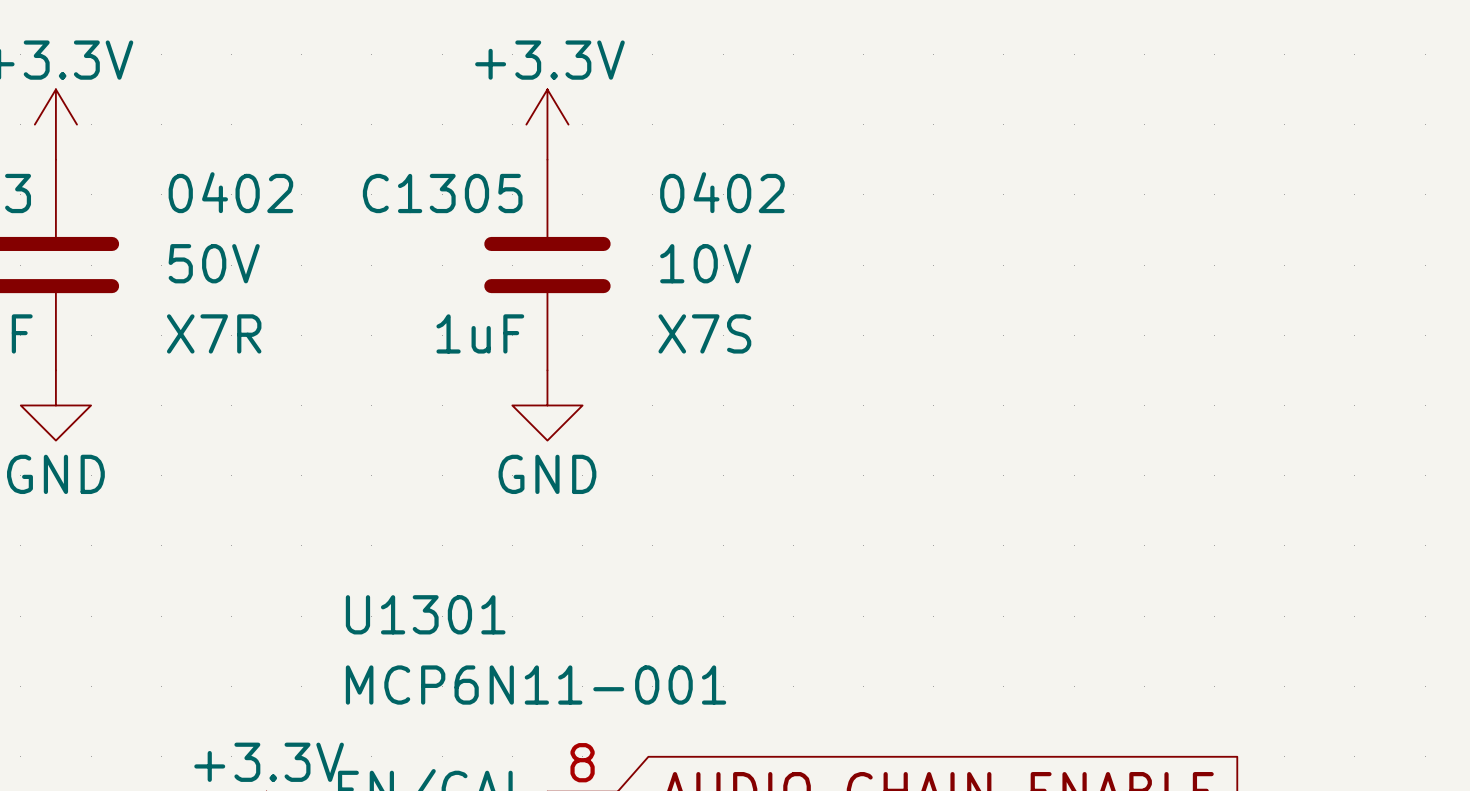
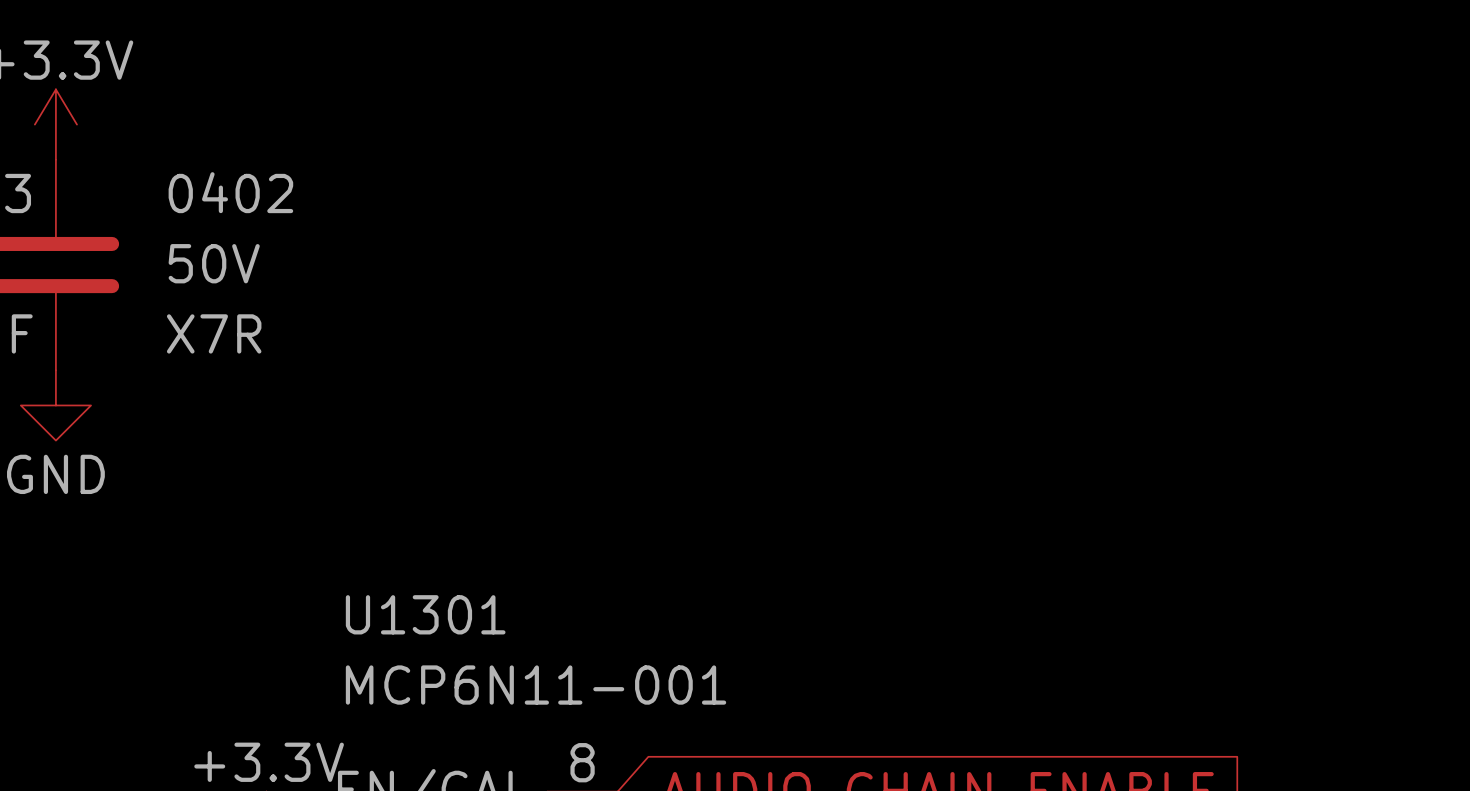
power symbol: +3.3V (547, 124) -> none
C1305: 1uF (547, 265) -> none
power symbol: GND (547, 405) -> none

